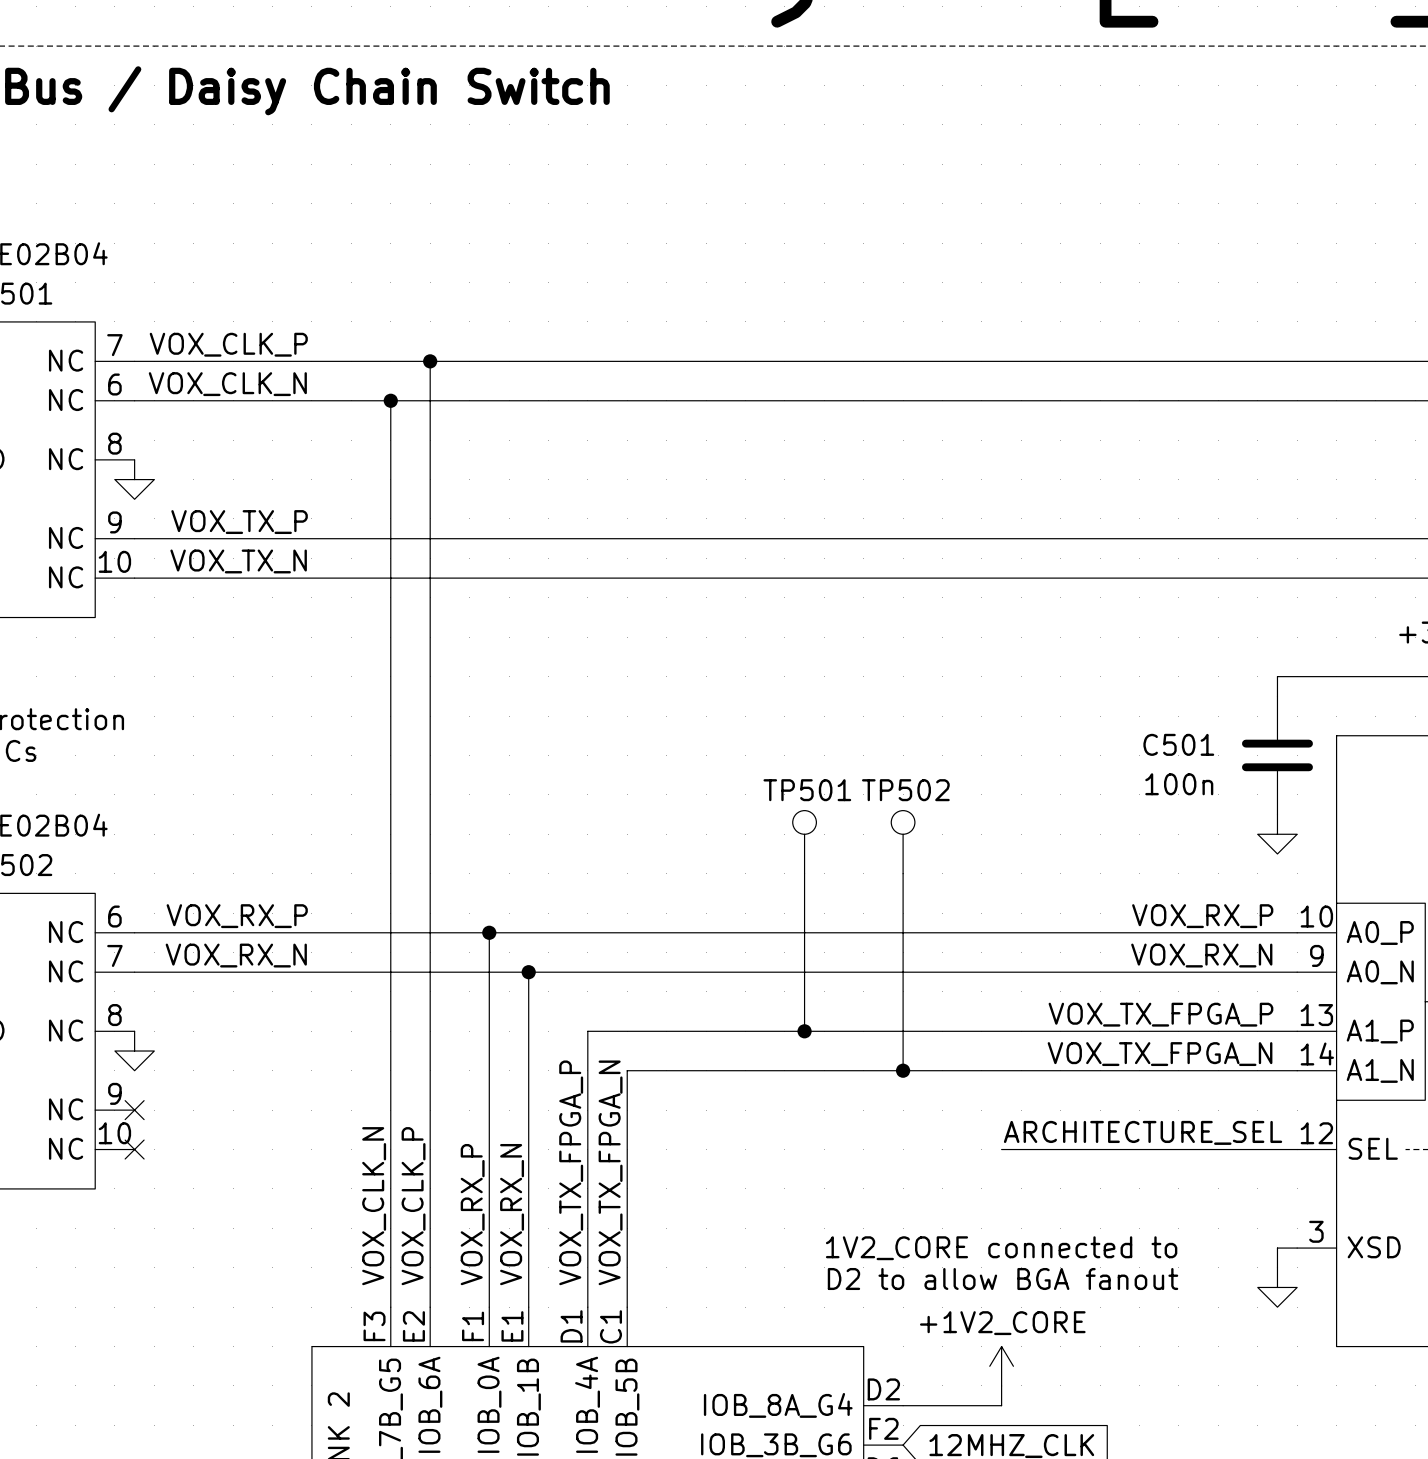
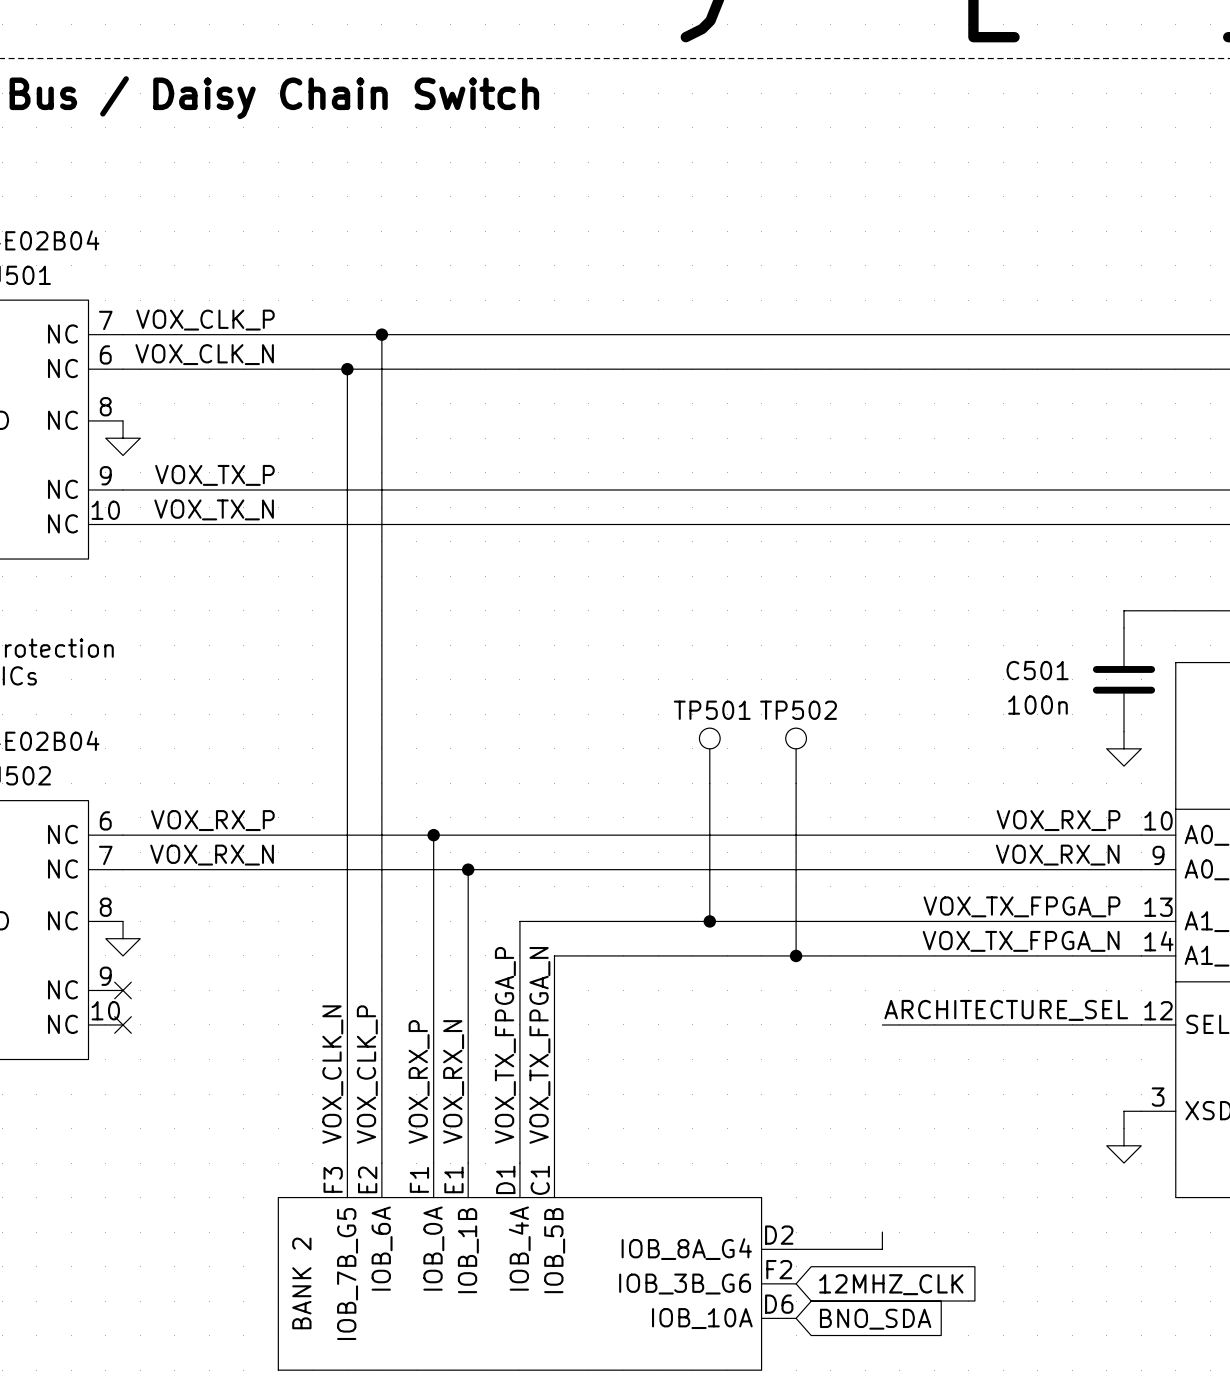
text: 1V2_CORE connected to (1001, 1248) -> none
text: D2 to allow BGA fanout (1003, 1279) -> none
power symbol: +1V2_CORE (1001, 1366) -> none

